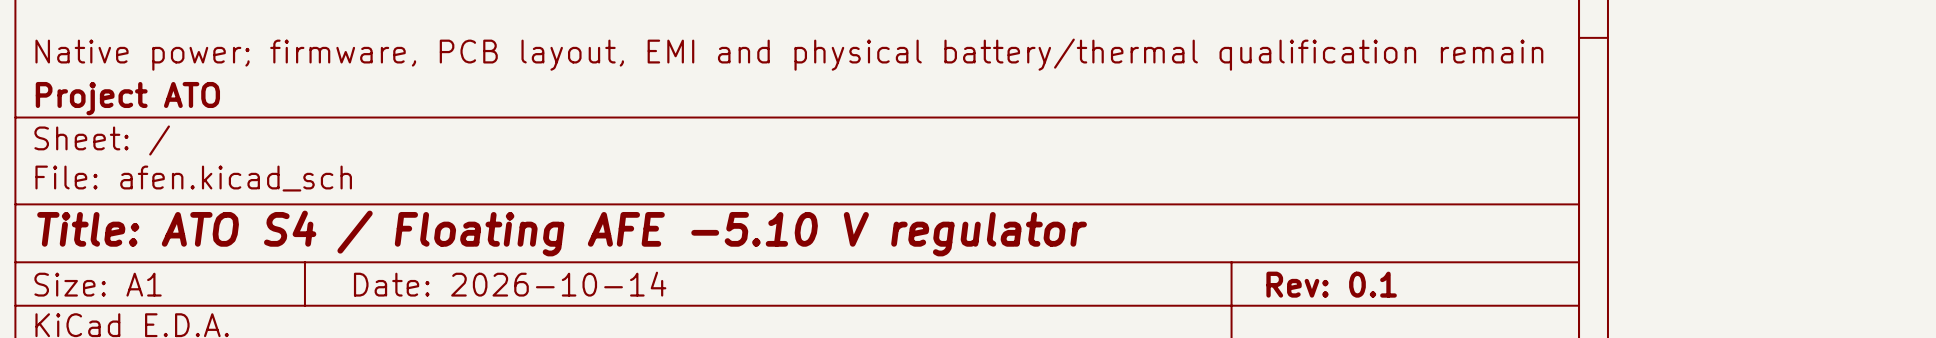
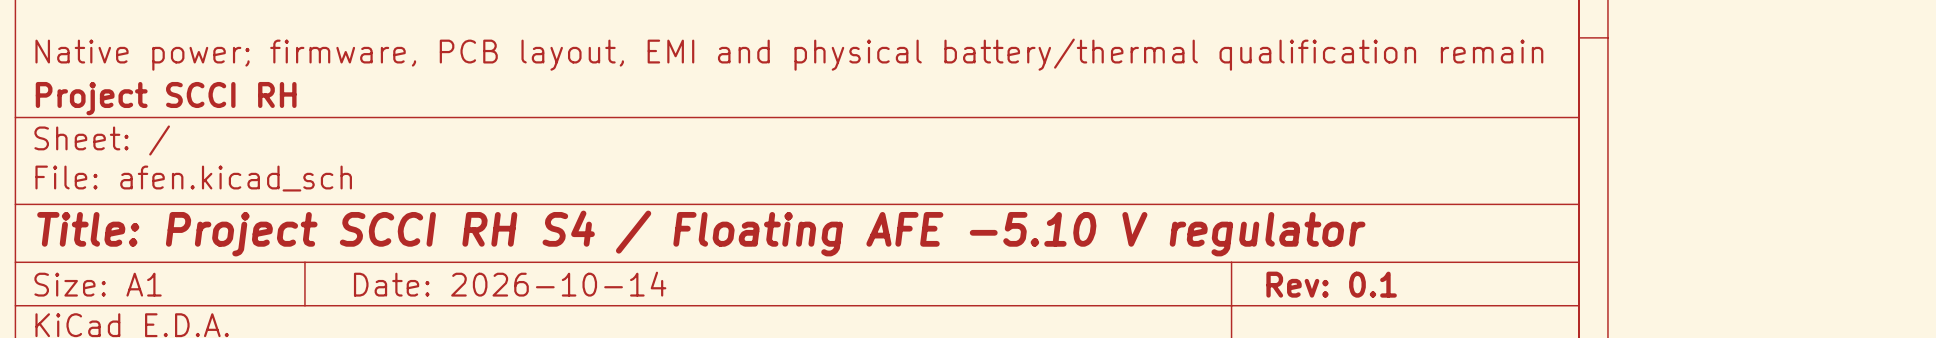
title block: Project ATO (127, 98) -> Project SCCI RH (166, 98)
title block: Title: ATO S4 / Floating AFE -5.10 V regulator (562, 233) -> Title: Project SCCI RH S4 / Floating AFE -5.10 V regulator (701, 233)

